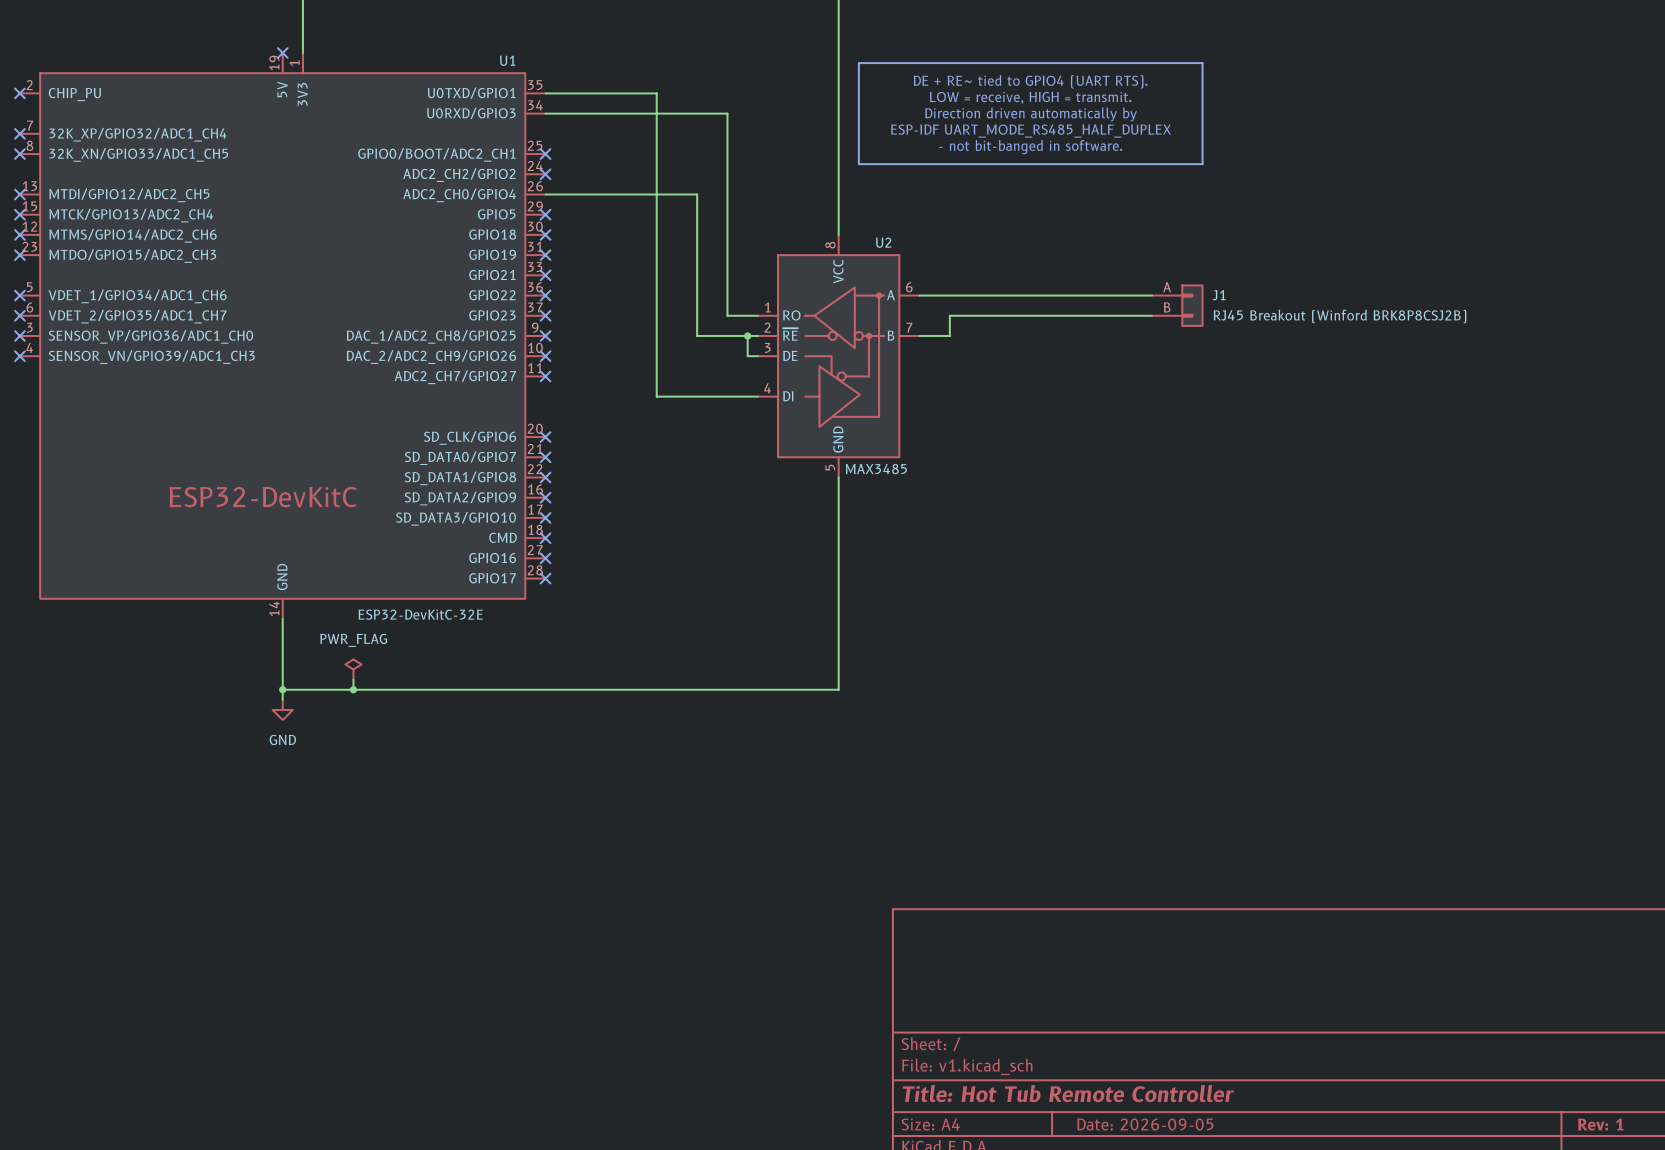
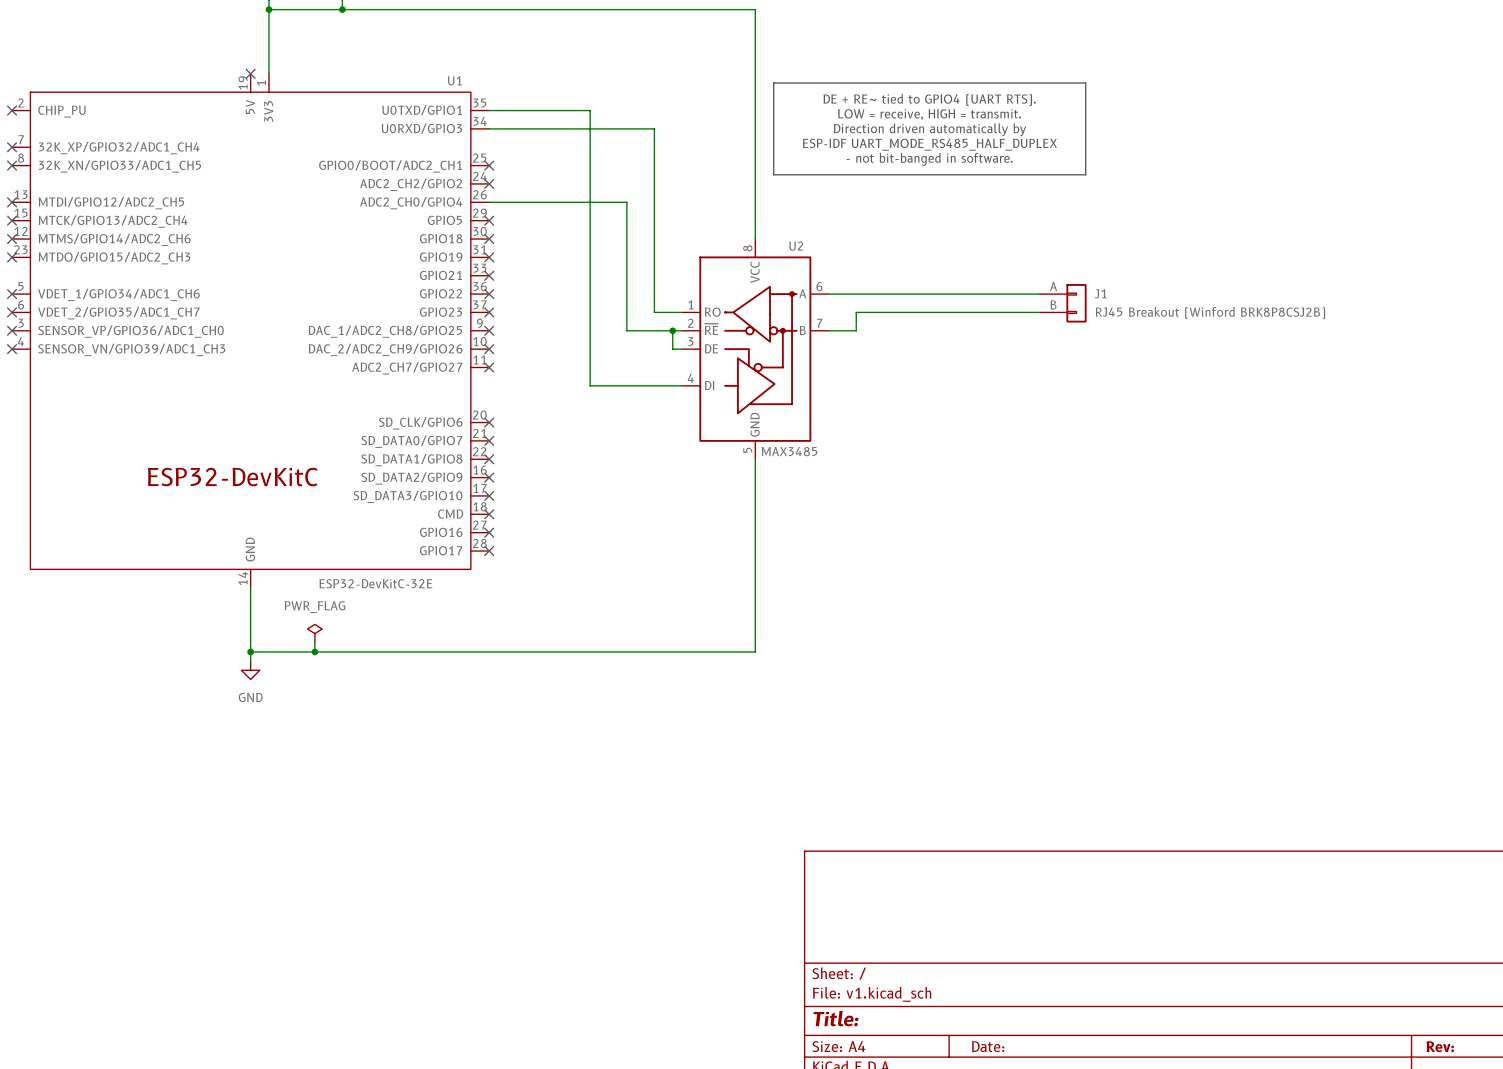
title block: Title: Hot Tub Remote Controller (1068, 1093) -> Title: (835, 1018)
title block: Date: 2026-09-05 (1145, 1124) -> Date: (988, 1046)
title block: Rev: 1 (1600, 1124) -> Rev: (1440, 1046)

